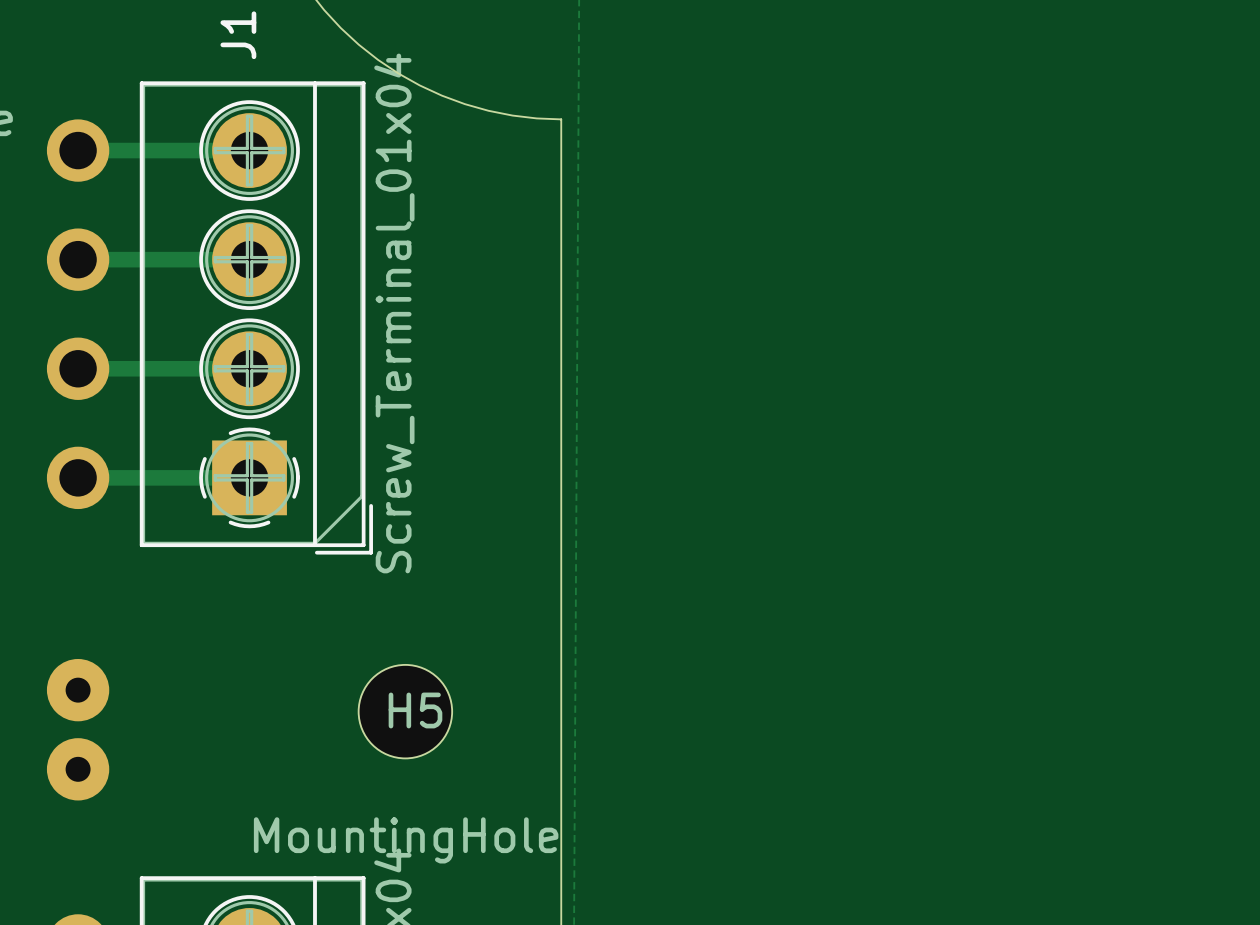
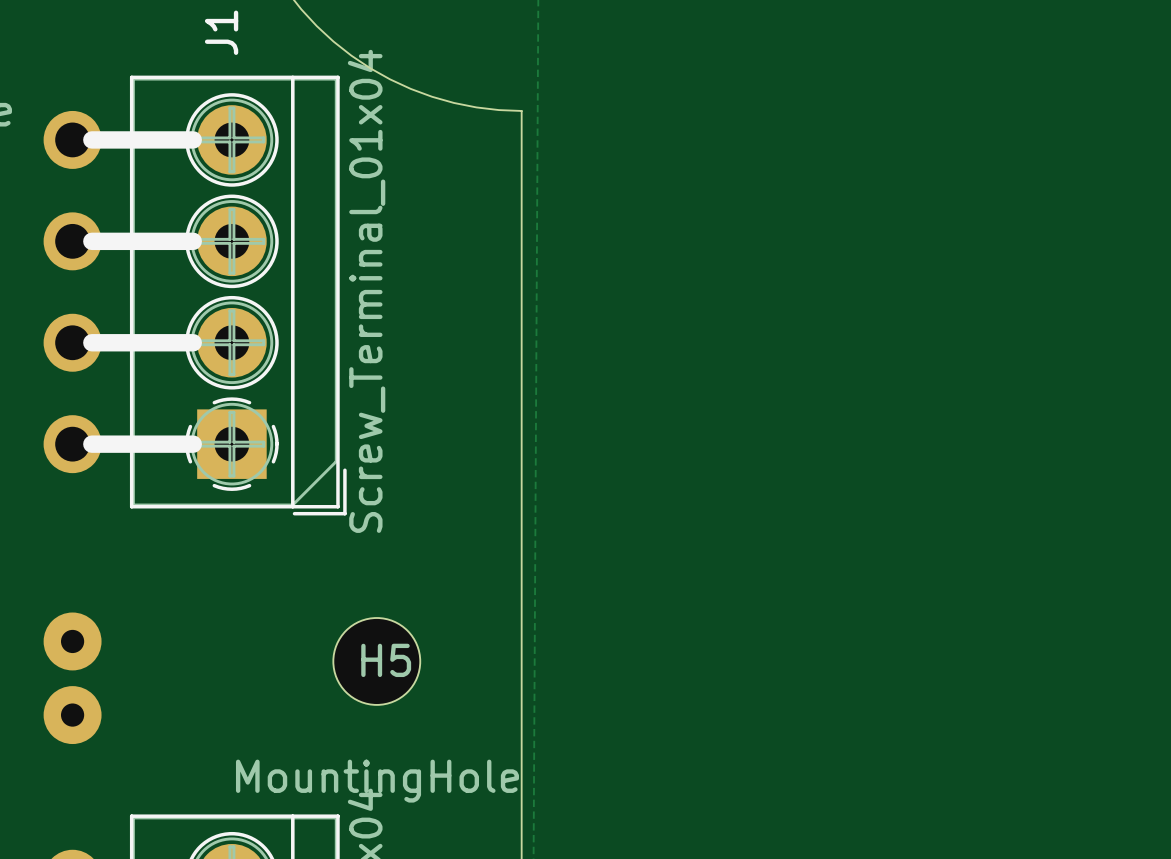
line: none -> (91, 139) (193, 139)
line: none -> (91, 241) (193, 241)
line: none -> (91, 342) (193, 342)
line: none -> (91, 444) (193, 444)

